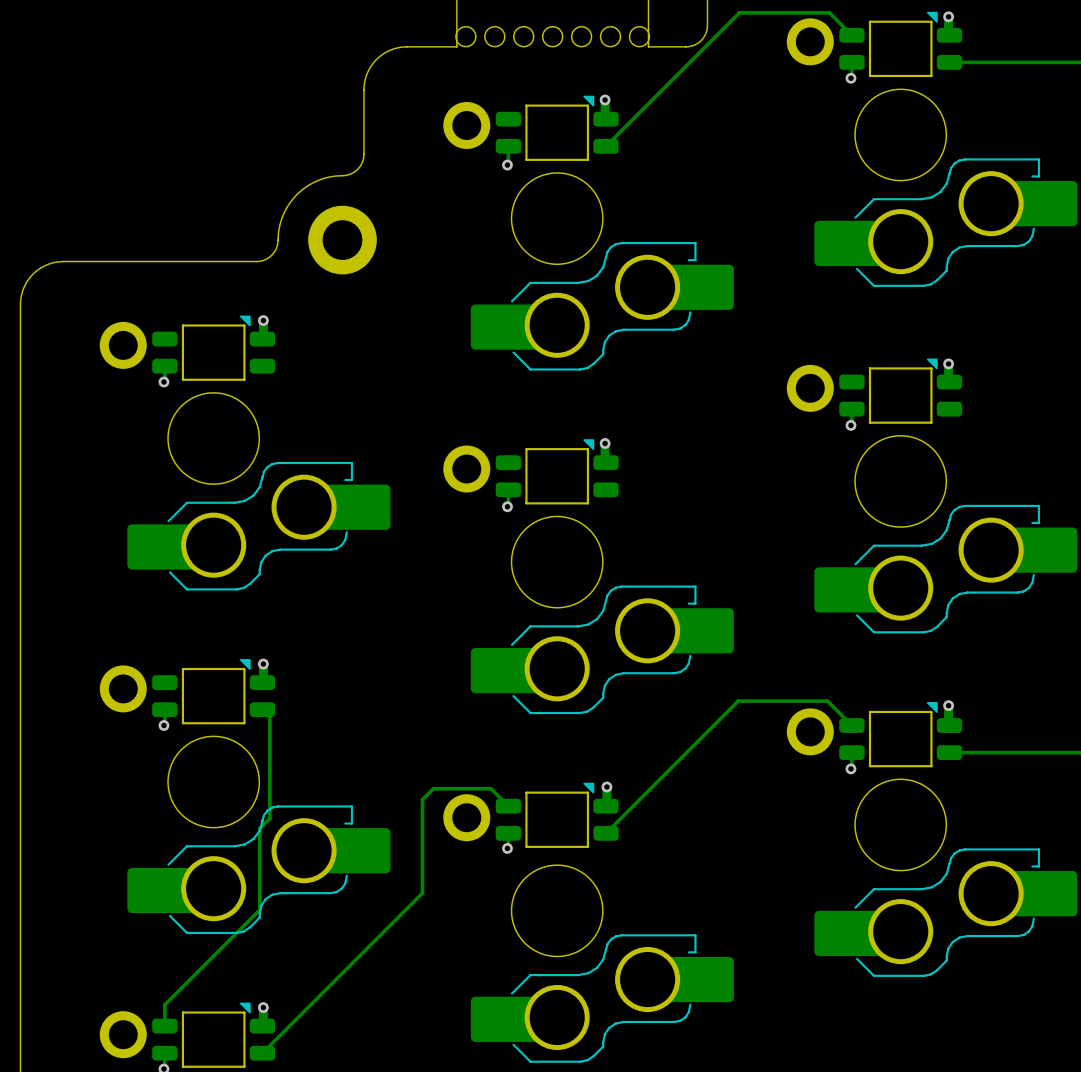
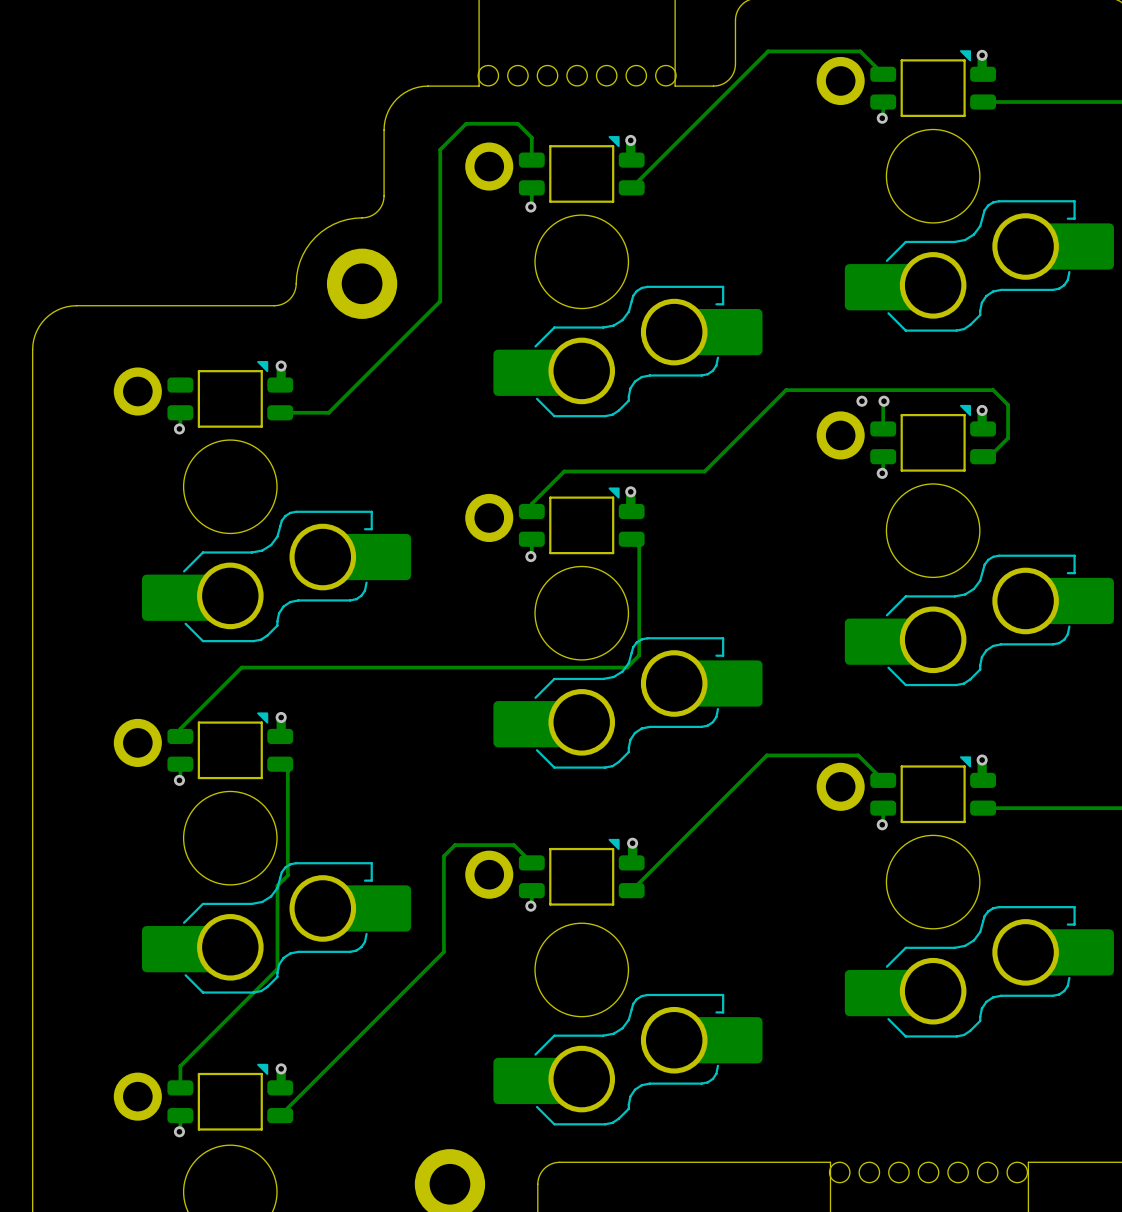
track: none -> (531, 160) (531, 137) (517, 123) (466, 123) (440, 149) (440, 301) (328, 412) (280, 412)
via: none -> (861, 401)
track: none -> (884, 401) (883, 428)
via: none -> (884, 401)
track: none -> (983, 456) (989, 456) (1008, 438) (1008, 404) (993, 390) (786, 390) (704, 471) (564, 471) (531, 503) (531, 511)
track: none -> (631, 539) (639, 546) (639, 655) (627, 667) (241, 667) (180, 728) (180, 736)

